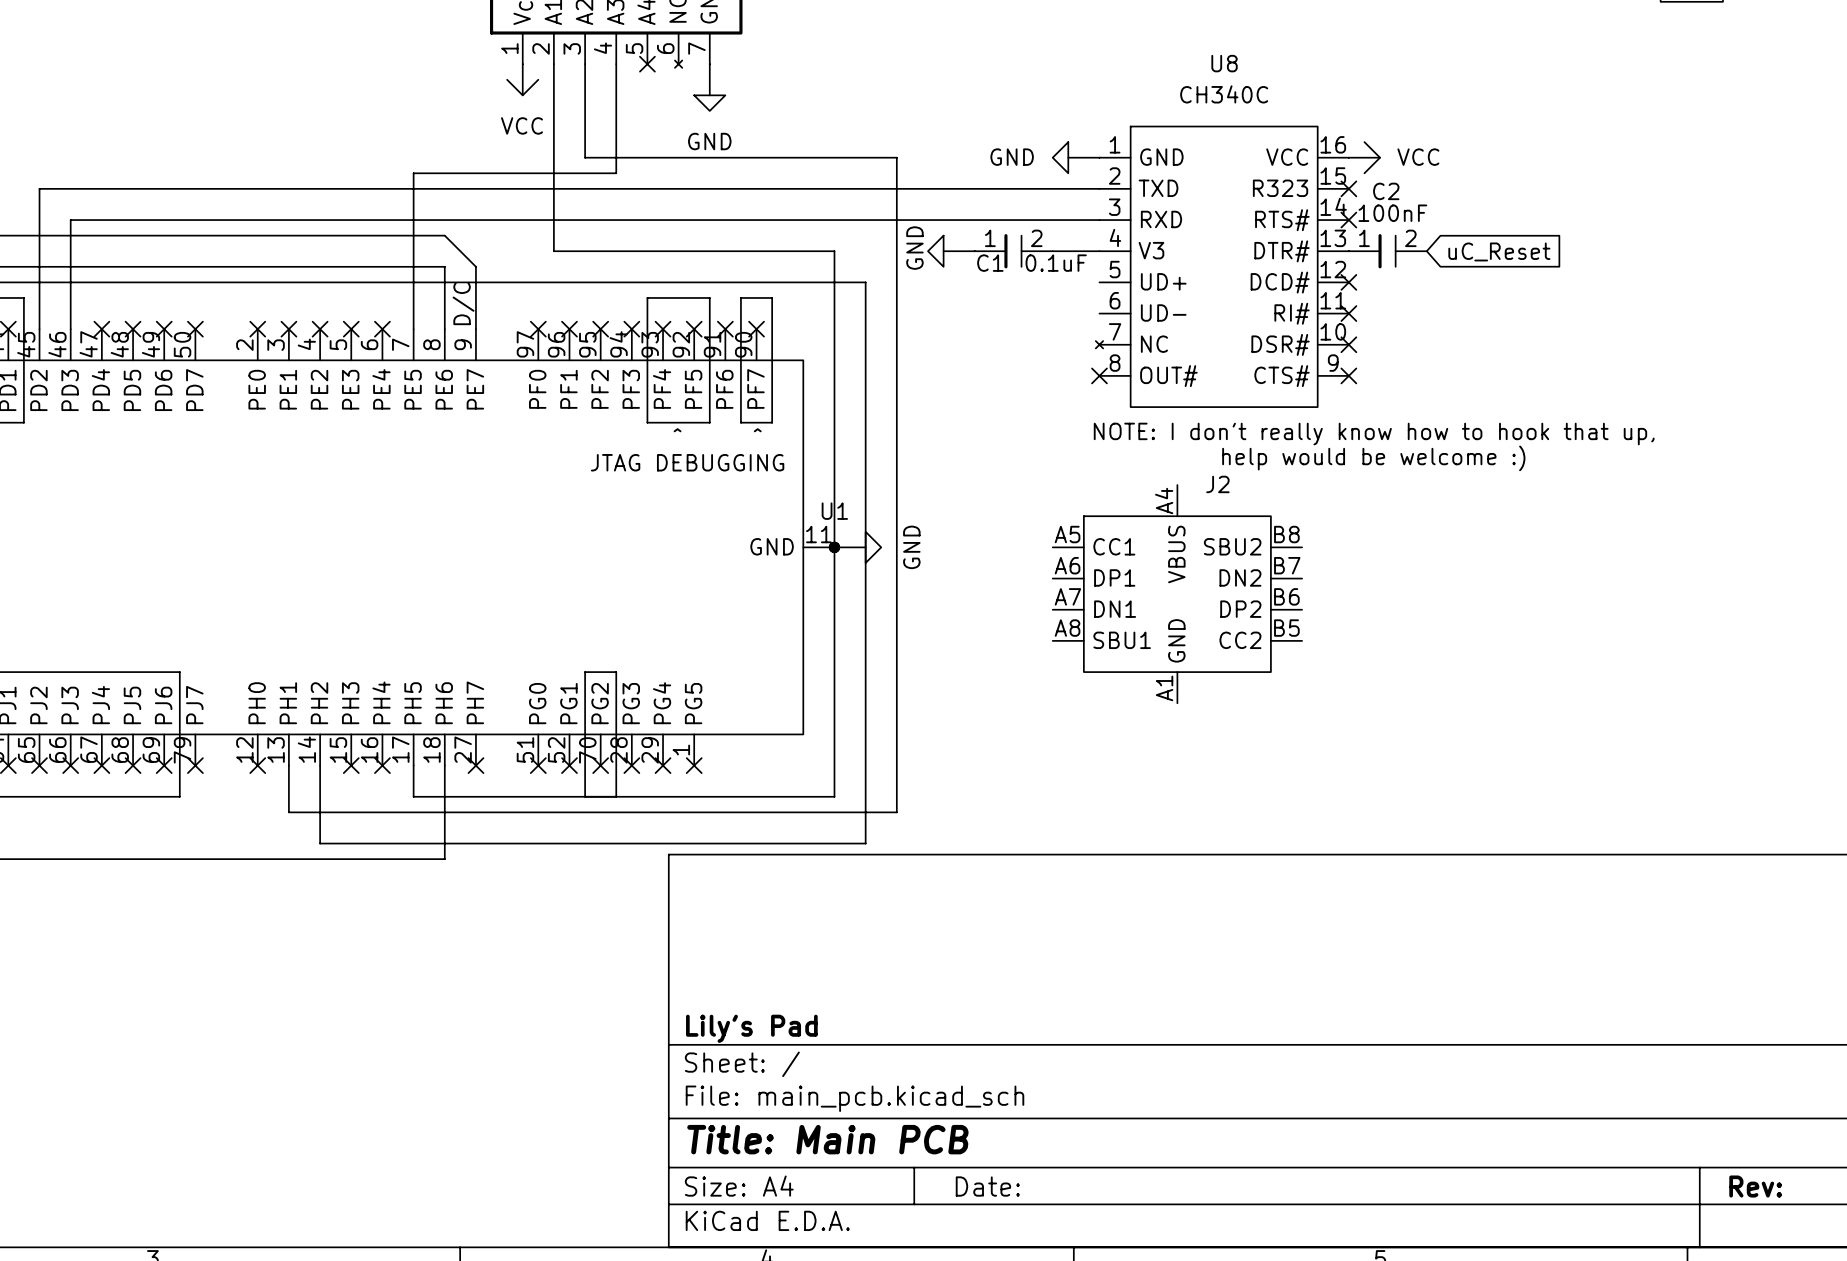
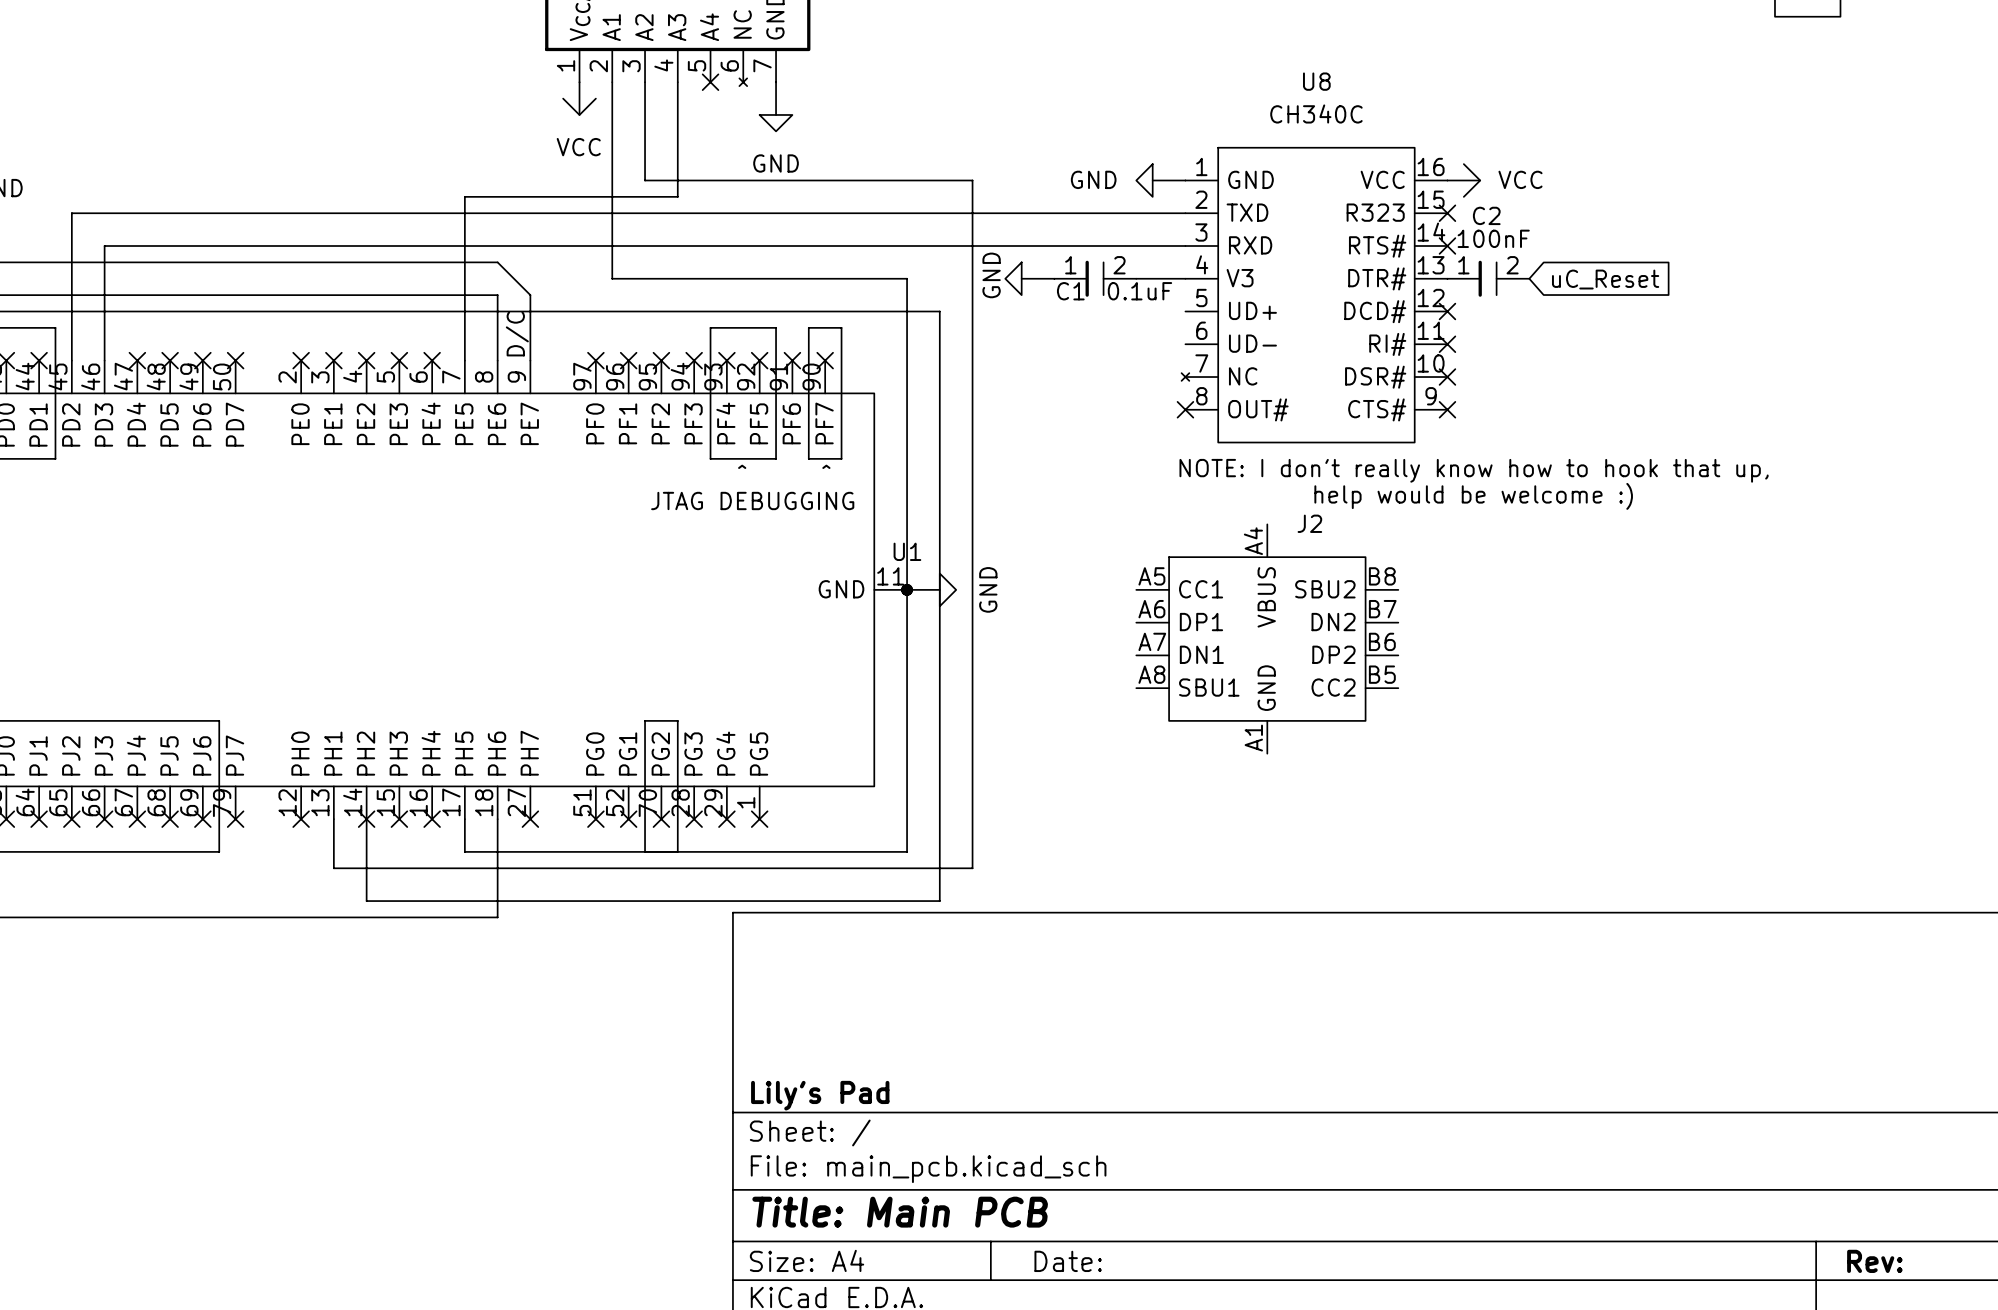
no-connect mark: none -> (366, 819)

